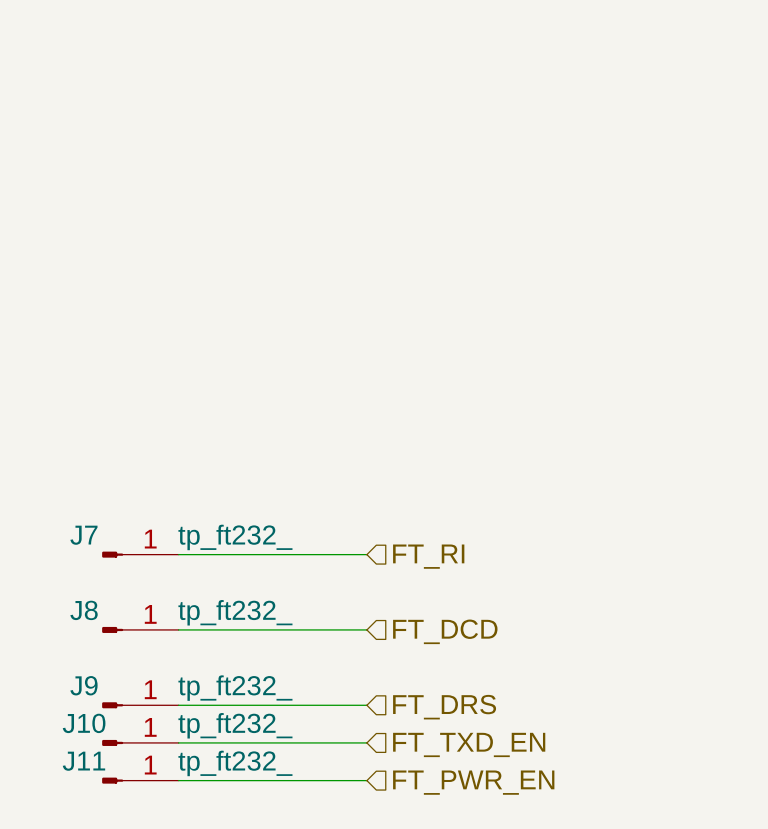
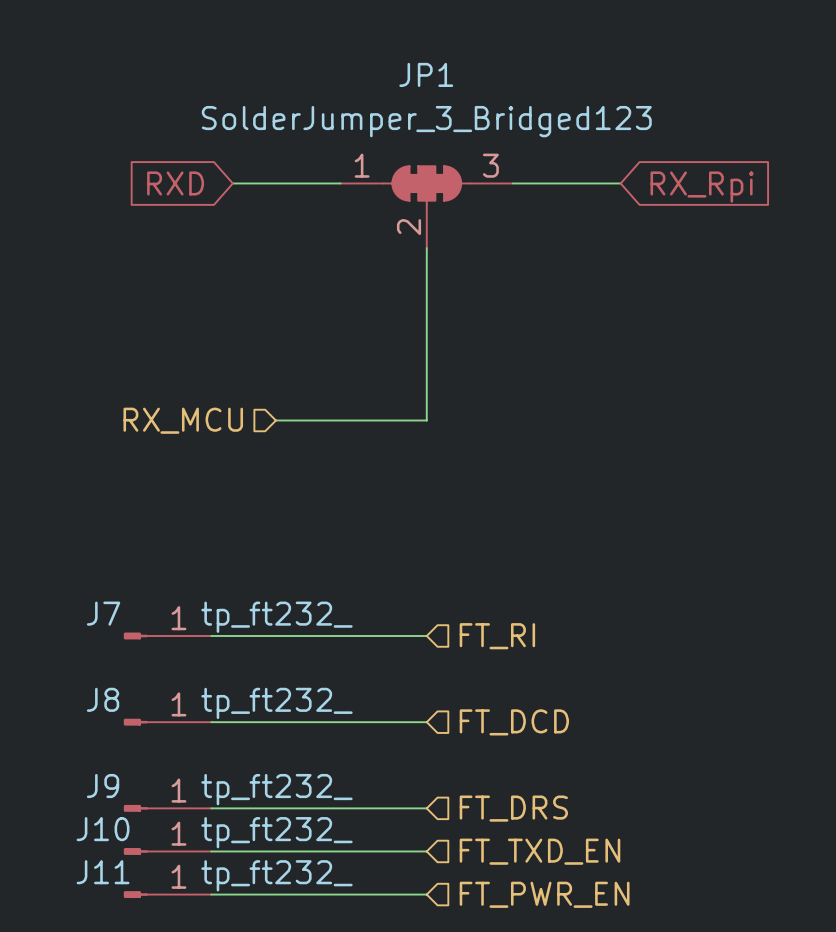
global label: none -> RXD (175, 183)
wire: none -> (232, 183) (340, 183)
wire: none -> (512, 183) (620, 183)
global label: none -> RX_Rpi (702, 187)
JP1: none -> SolderJumper_3_Bridged123 (426, 207)
wire: none -> (426, 248) (426, 420) (275, 420)
hierarchical label: none -> RX_MCU (183, 420)

